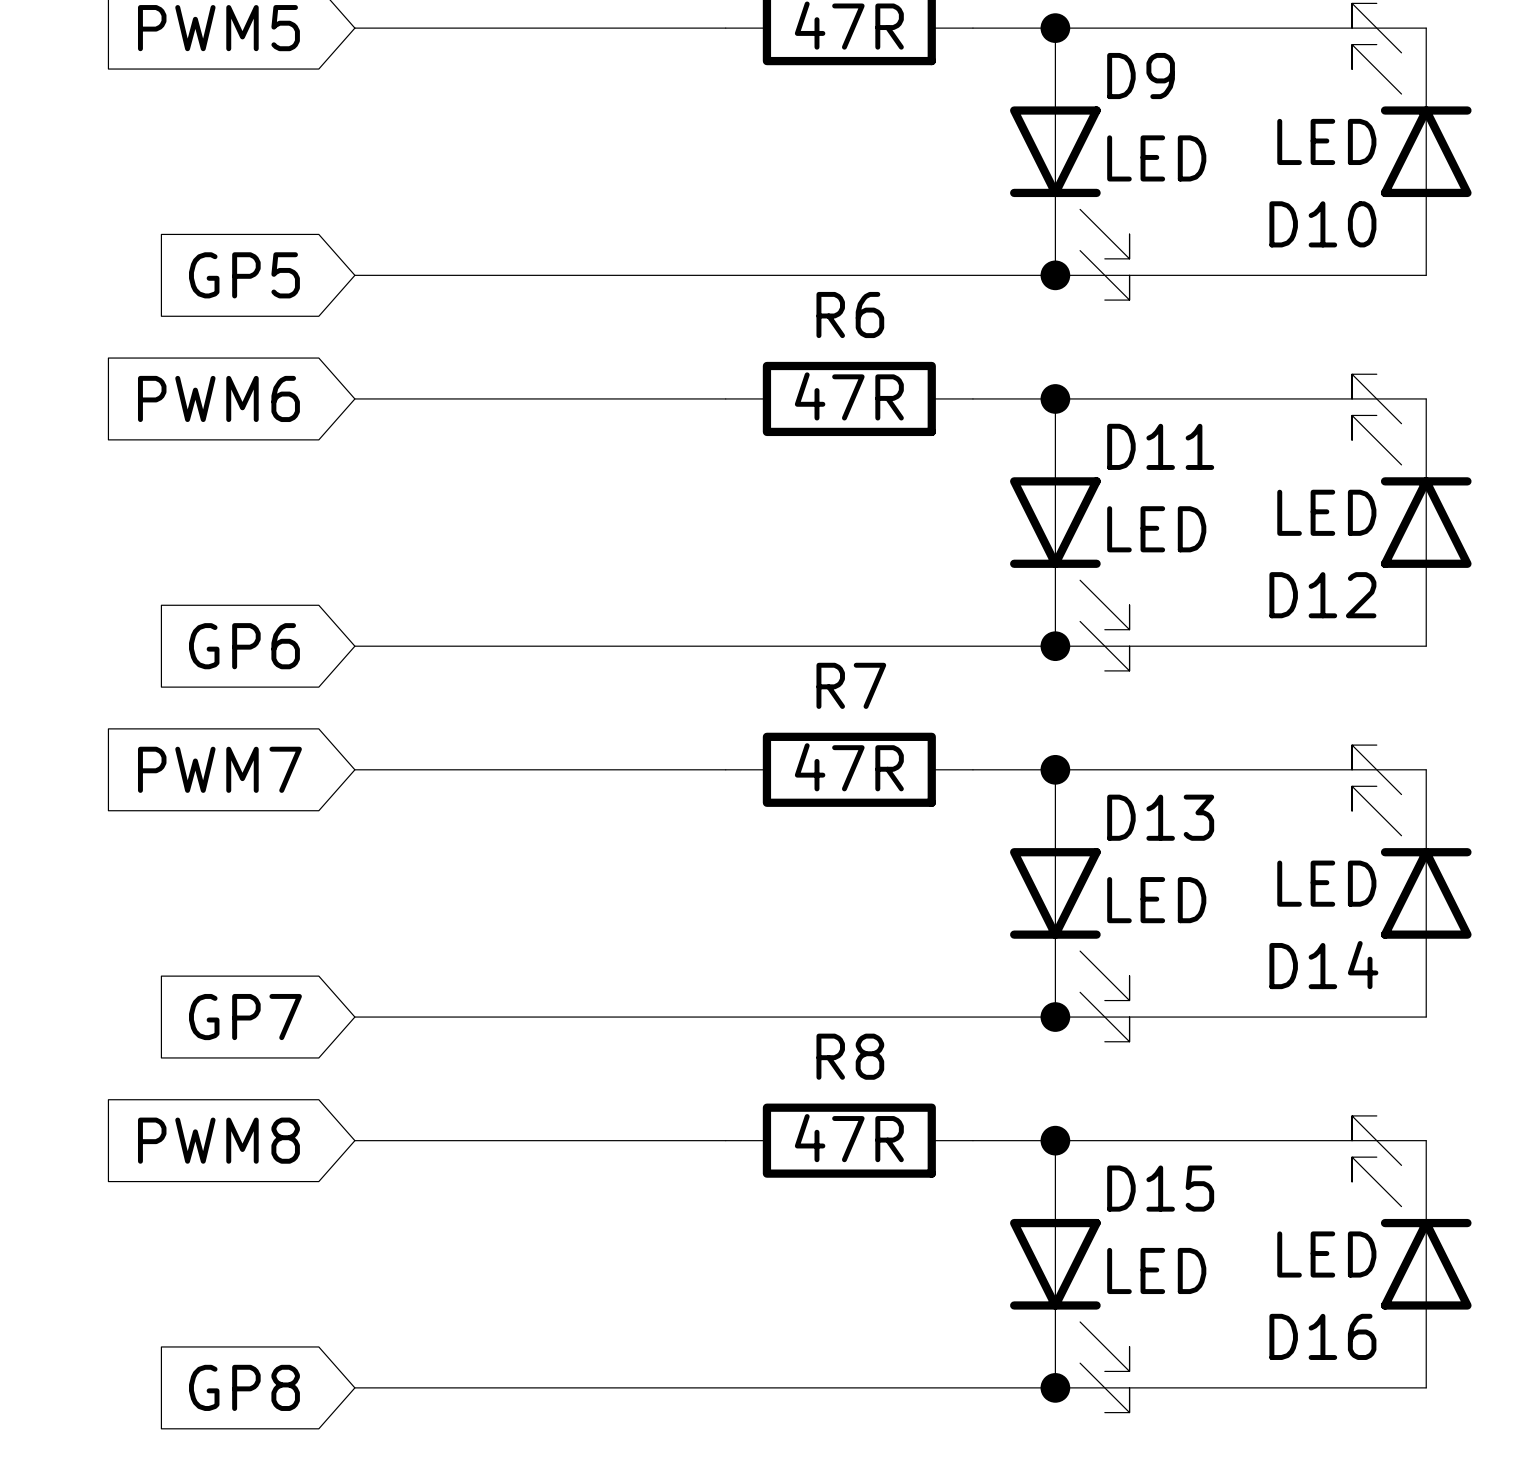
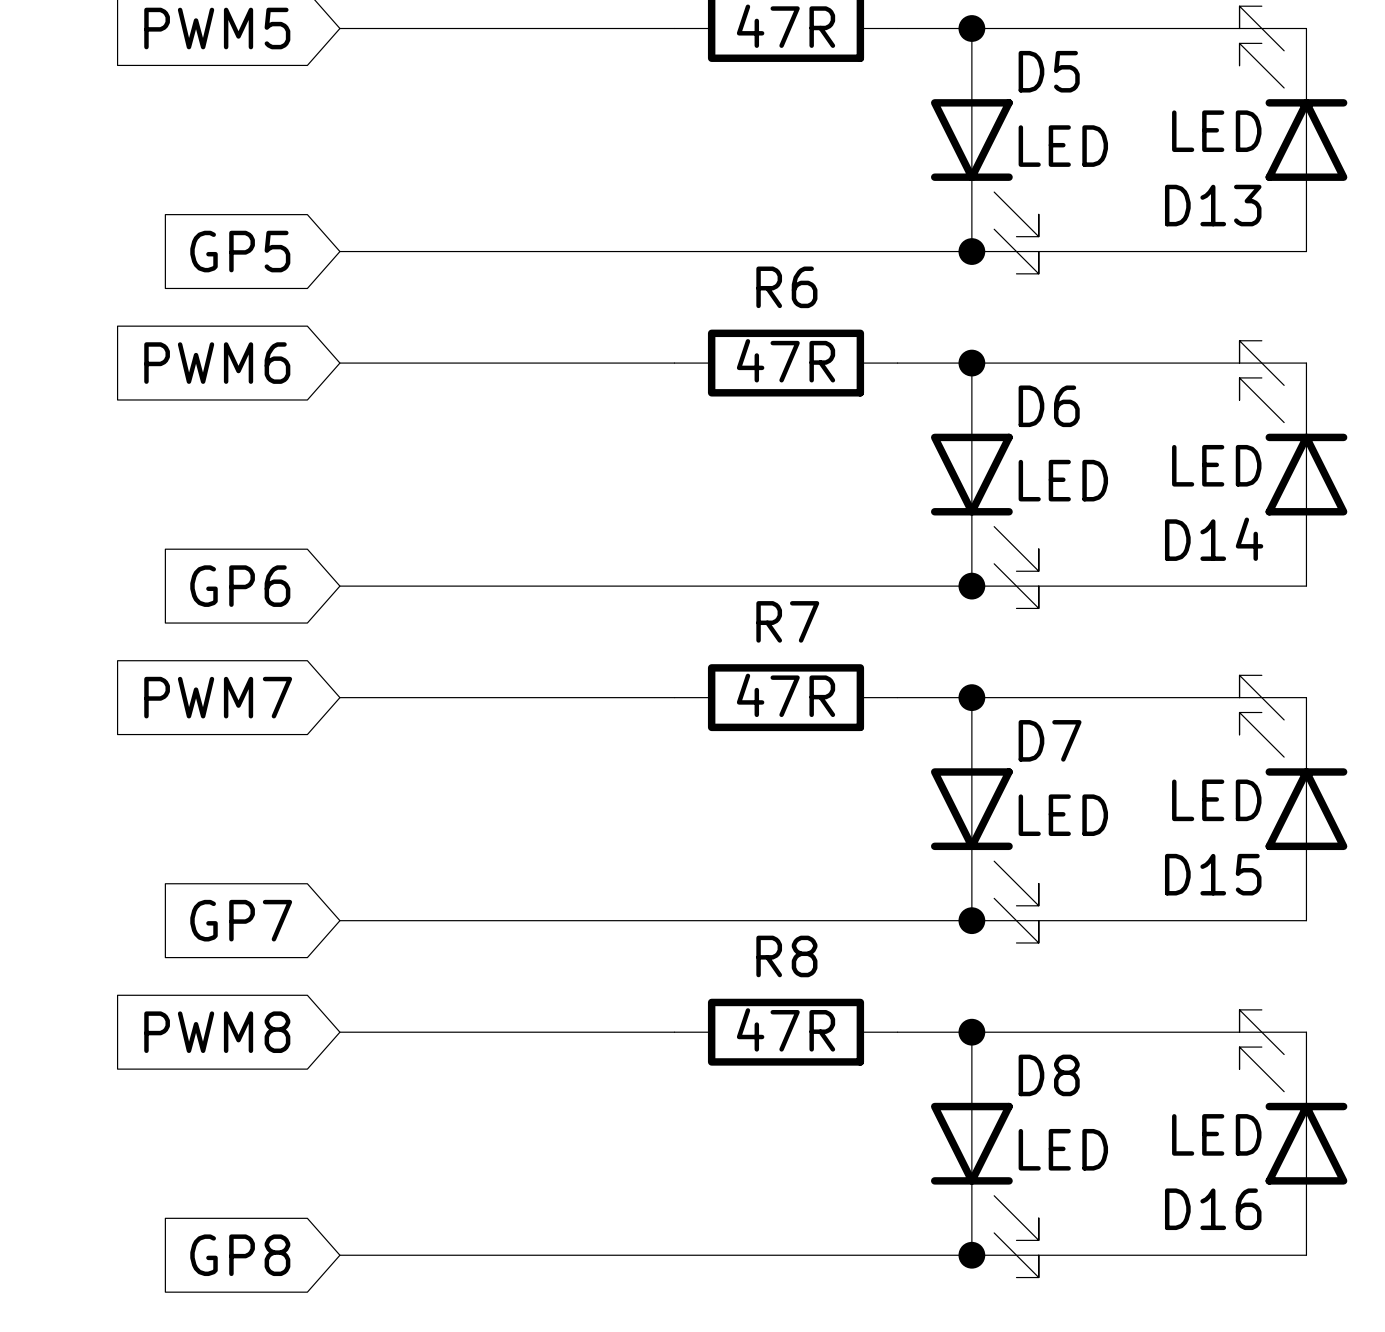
D9 name: D9 (1141, 76) -> D5 (1049, 71)
D10 name: D10 (1322, 224) -> D13 (1213, 205)
D11 name: D11 (1160, 446) -> D6 (1049, 406)
D12 name: D12 (1322, 595) -> D14 (1214, 539)
D13 name: D13 (1160, 817) -> D7 (1050, 740)
D14 name: D14 (1323, 965) -> D15 (1213, 874)
D15 name: D15 (1160, 1188) -> D8 (1049, 1075)

